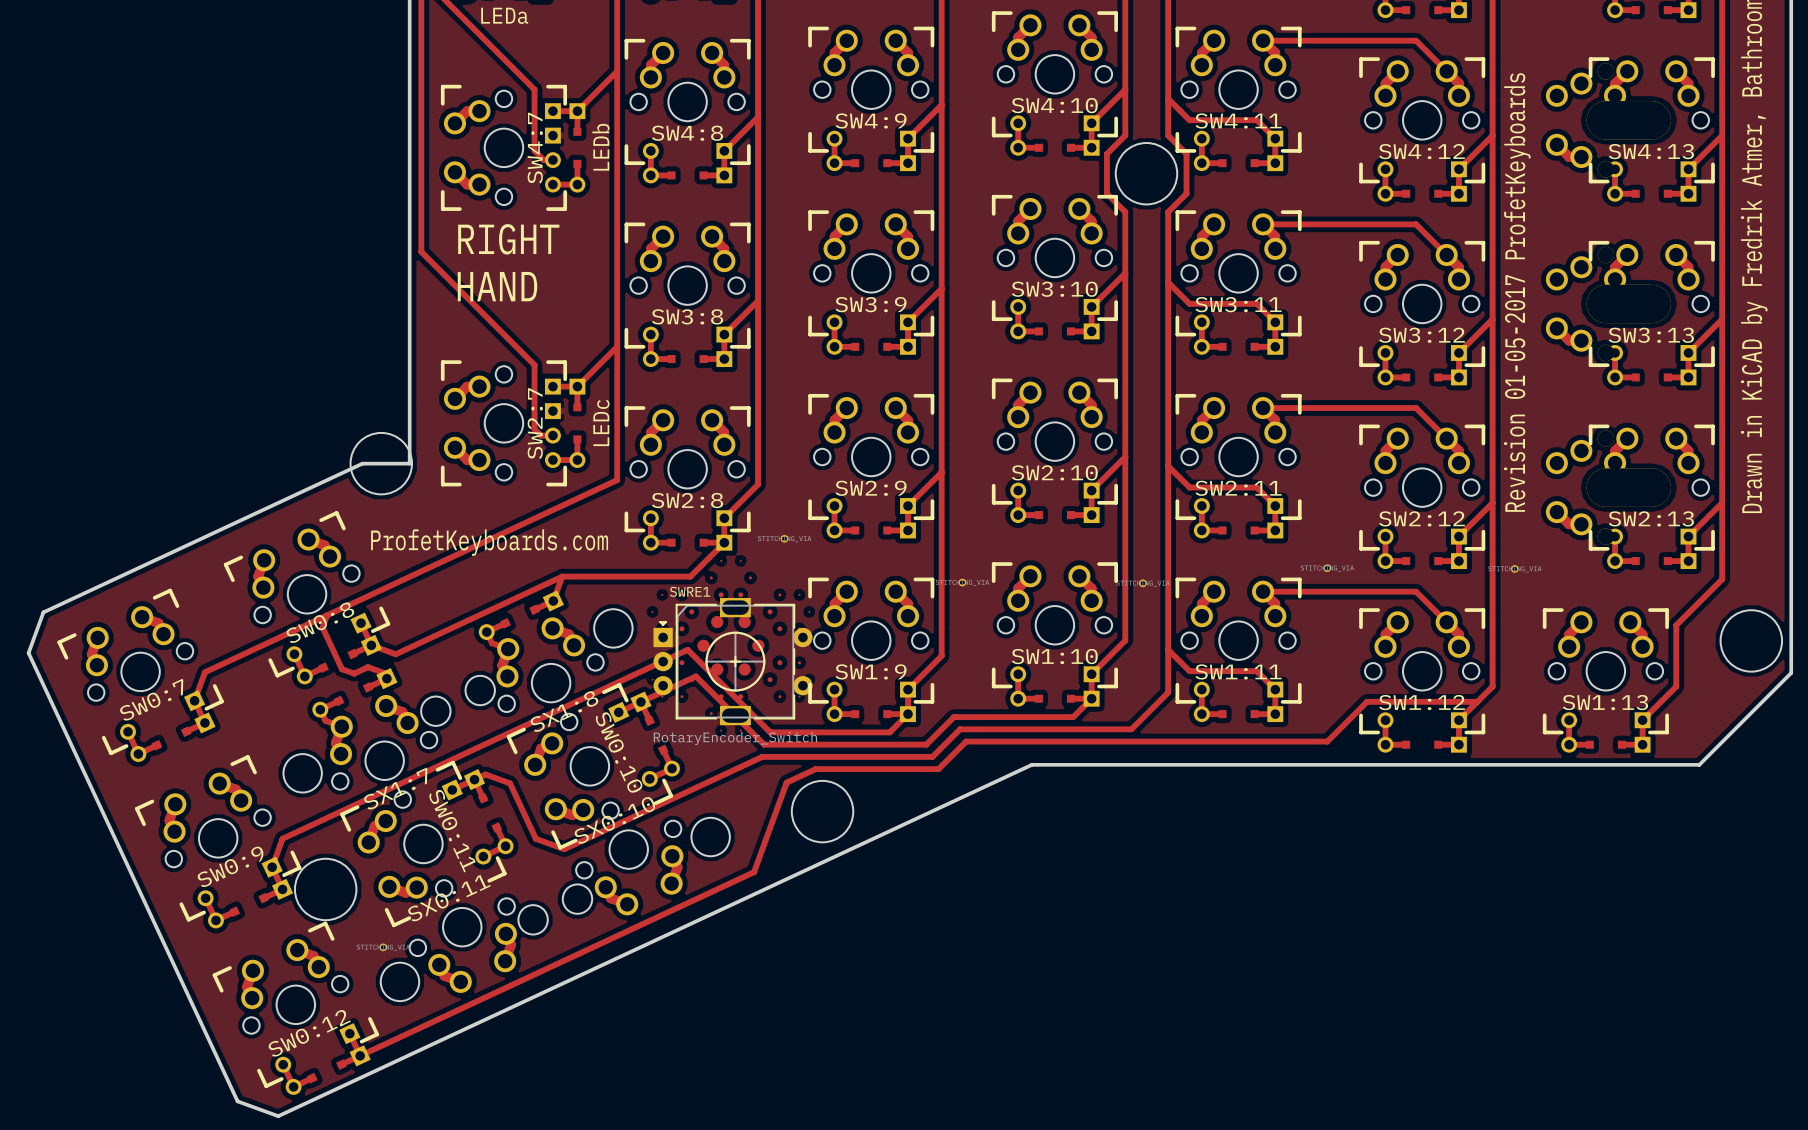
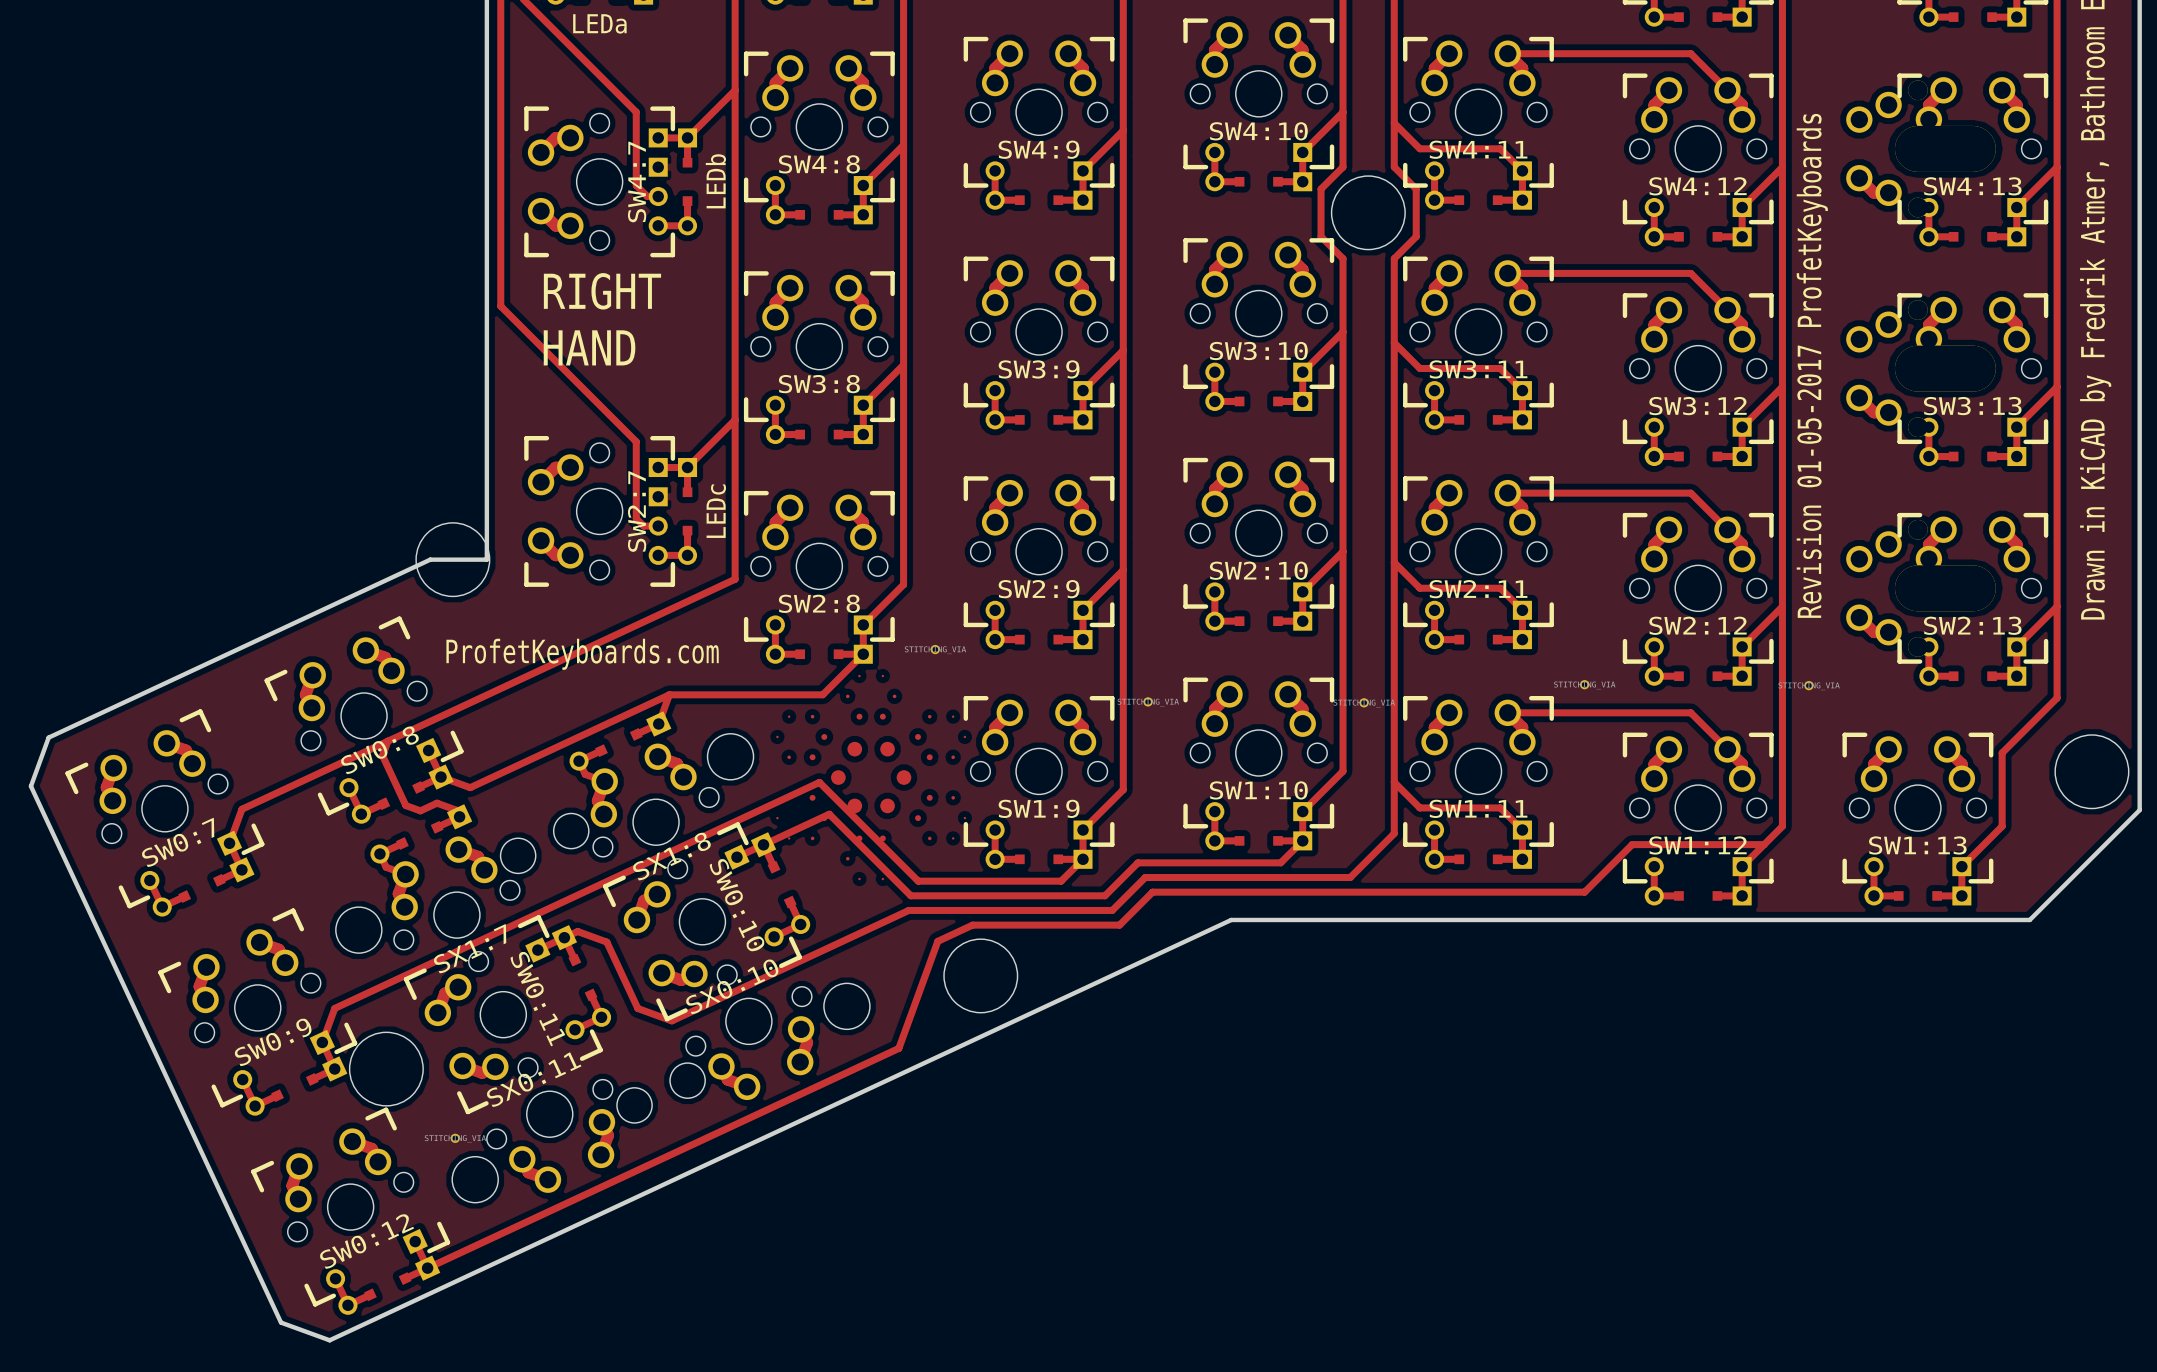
SWRE1: RotaryEncoder_Switch (733, 661) -> none

